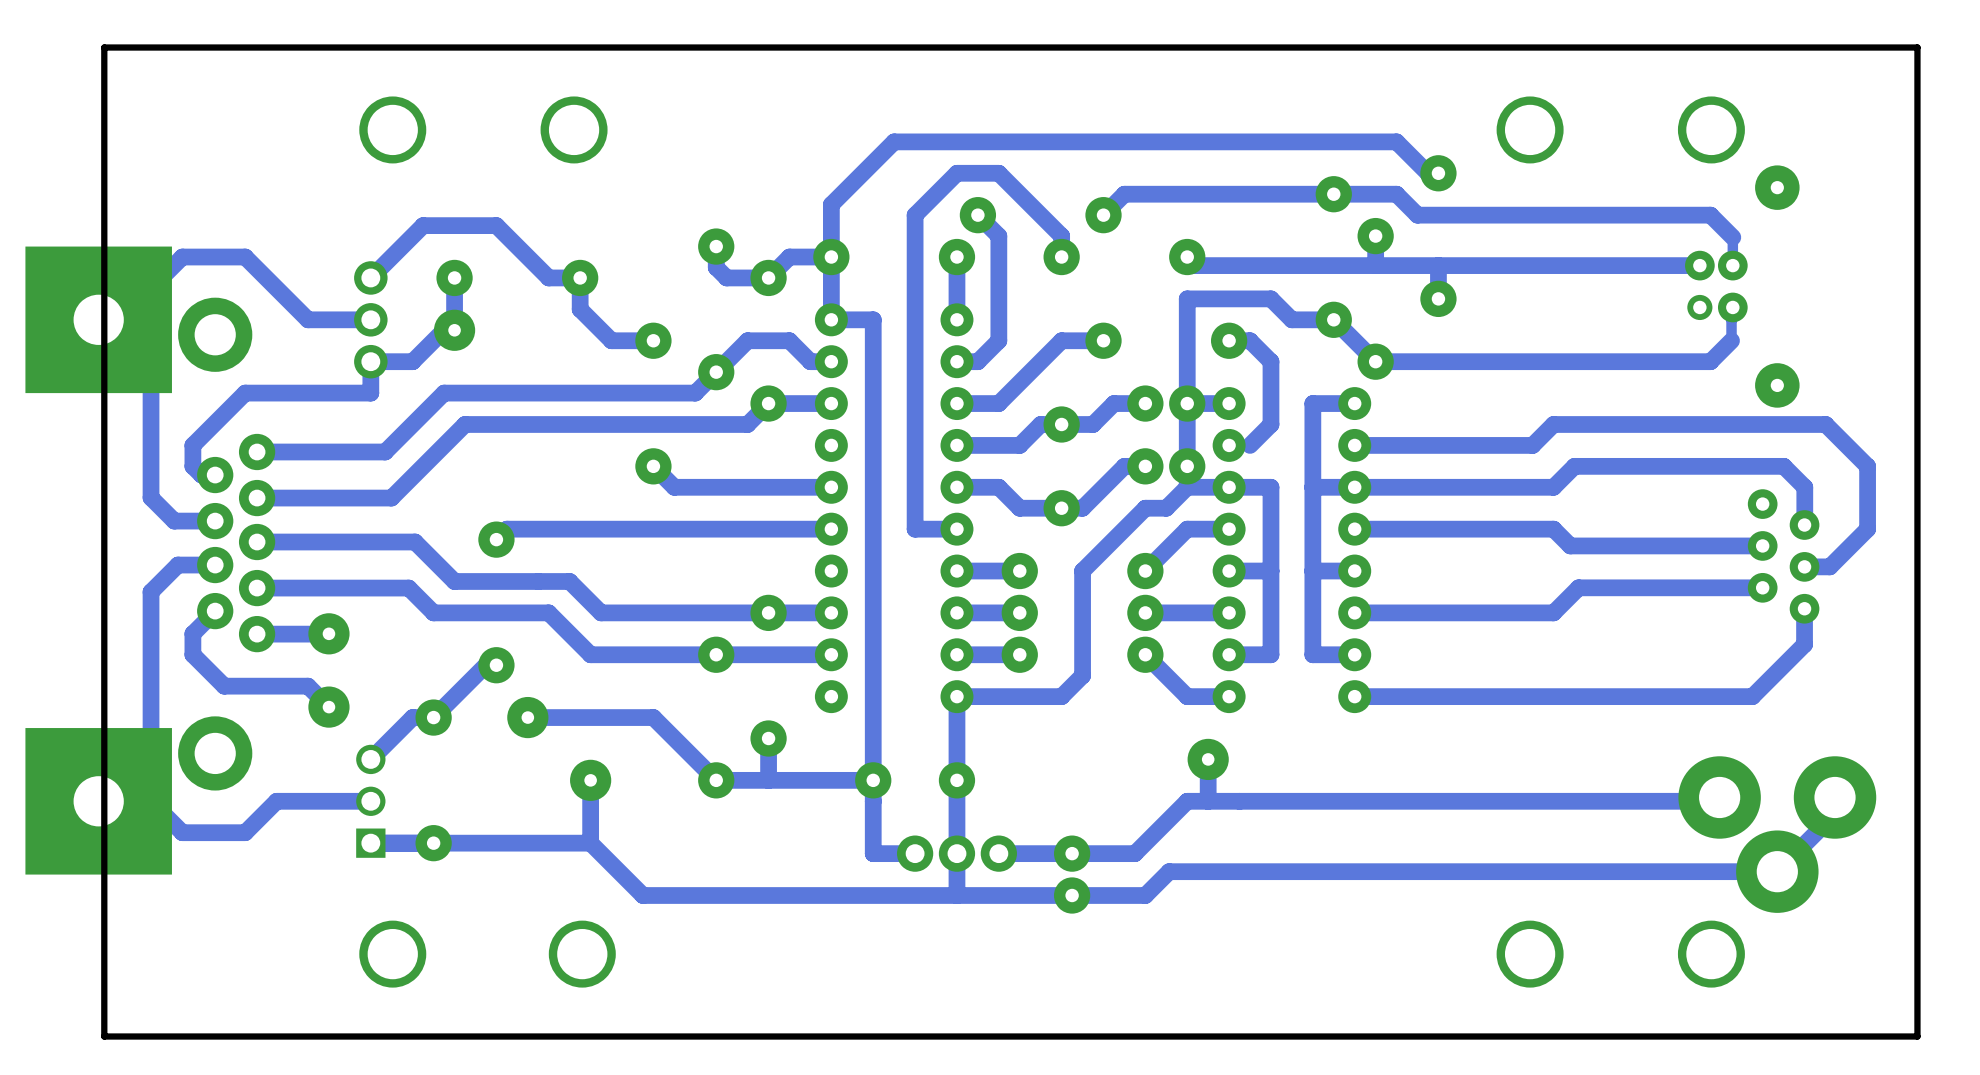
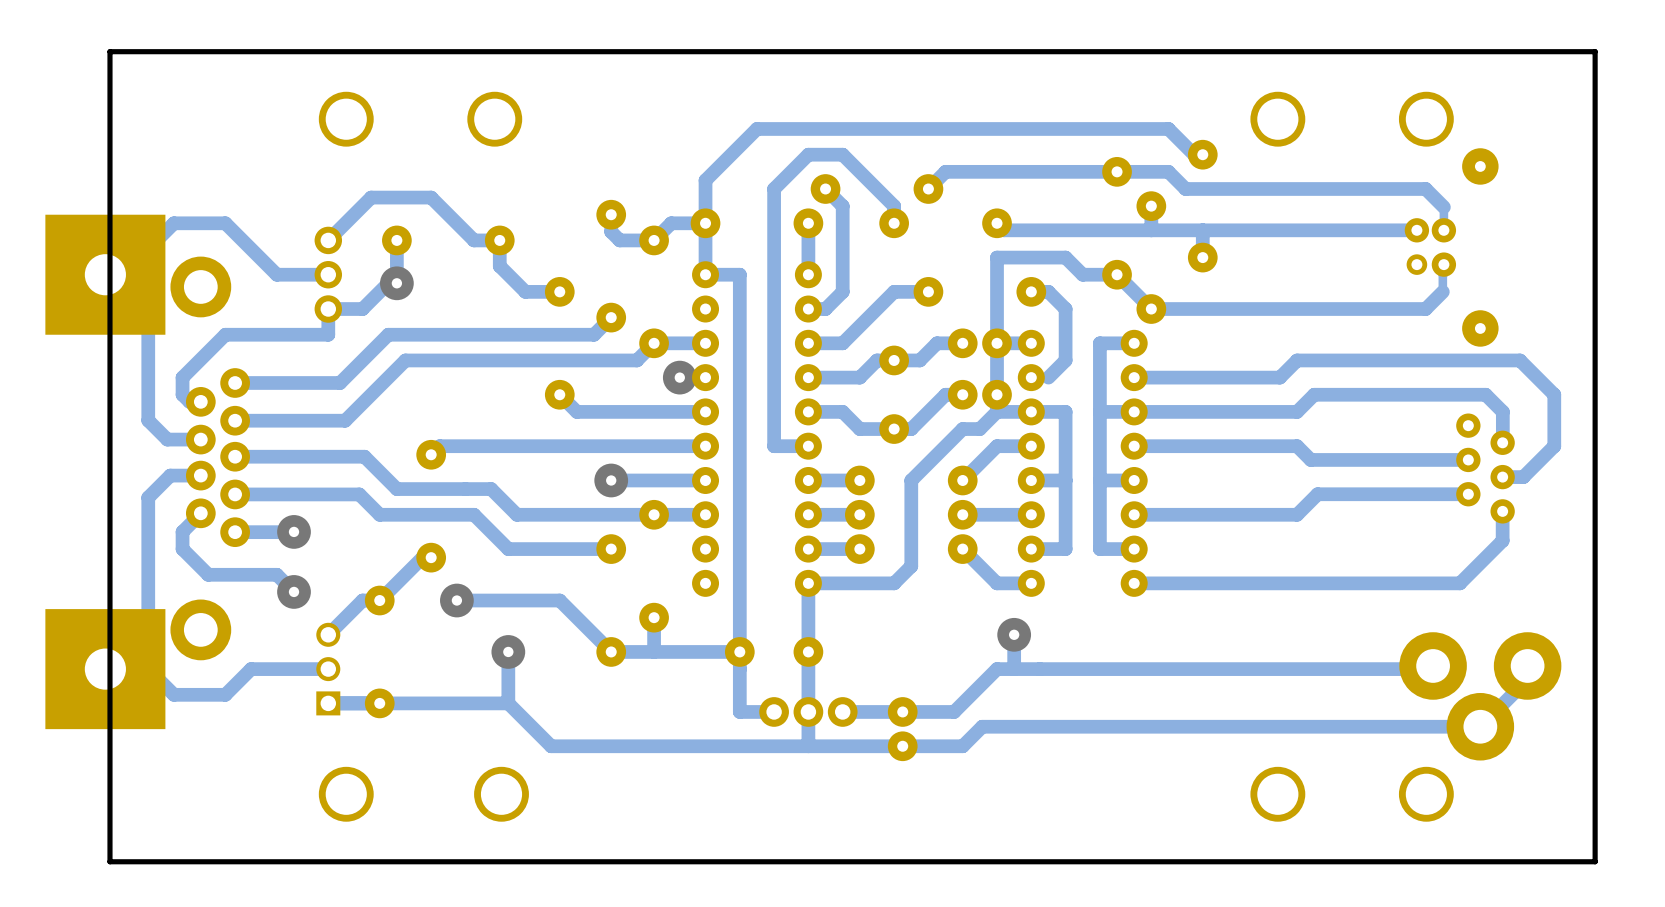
track: (831, 361) (810, 361) (789, 340) (747, 340) (716, 372) -> none
via: none -> (679, 377)
via: none -> (611, 480)
track: (831, 654) (716, 654) -> (705, 480) (611, 480)

